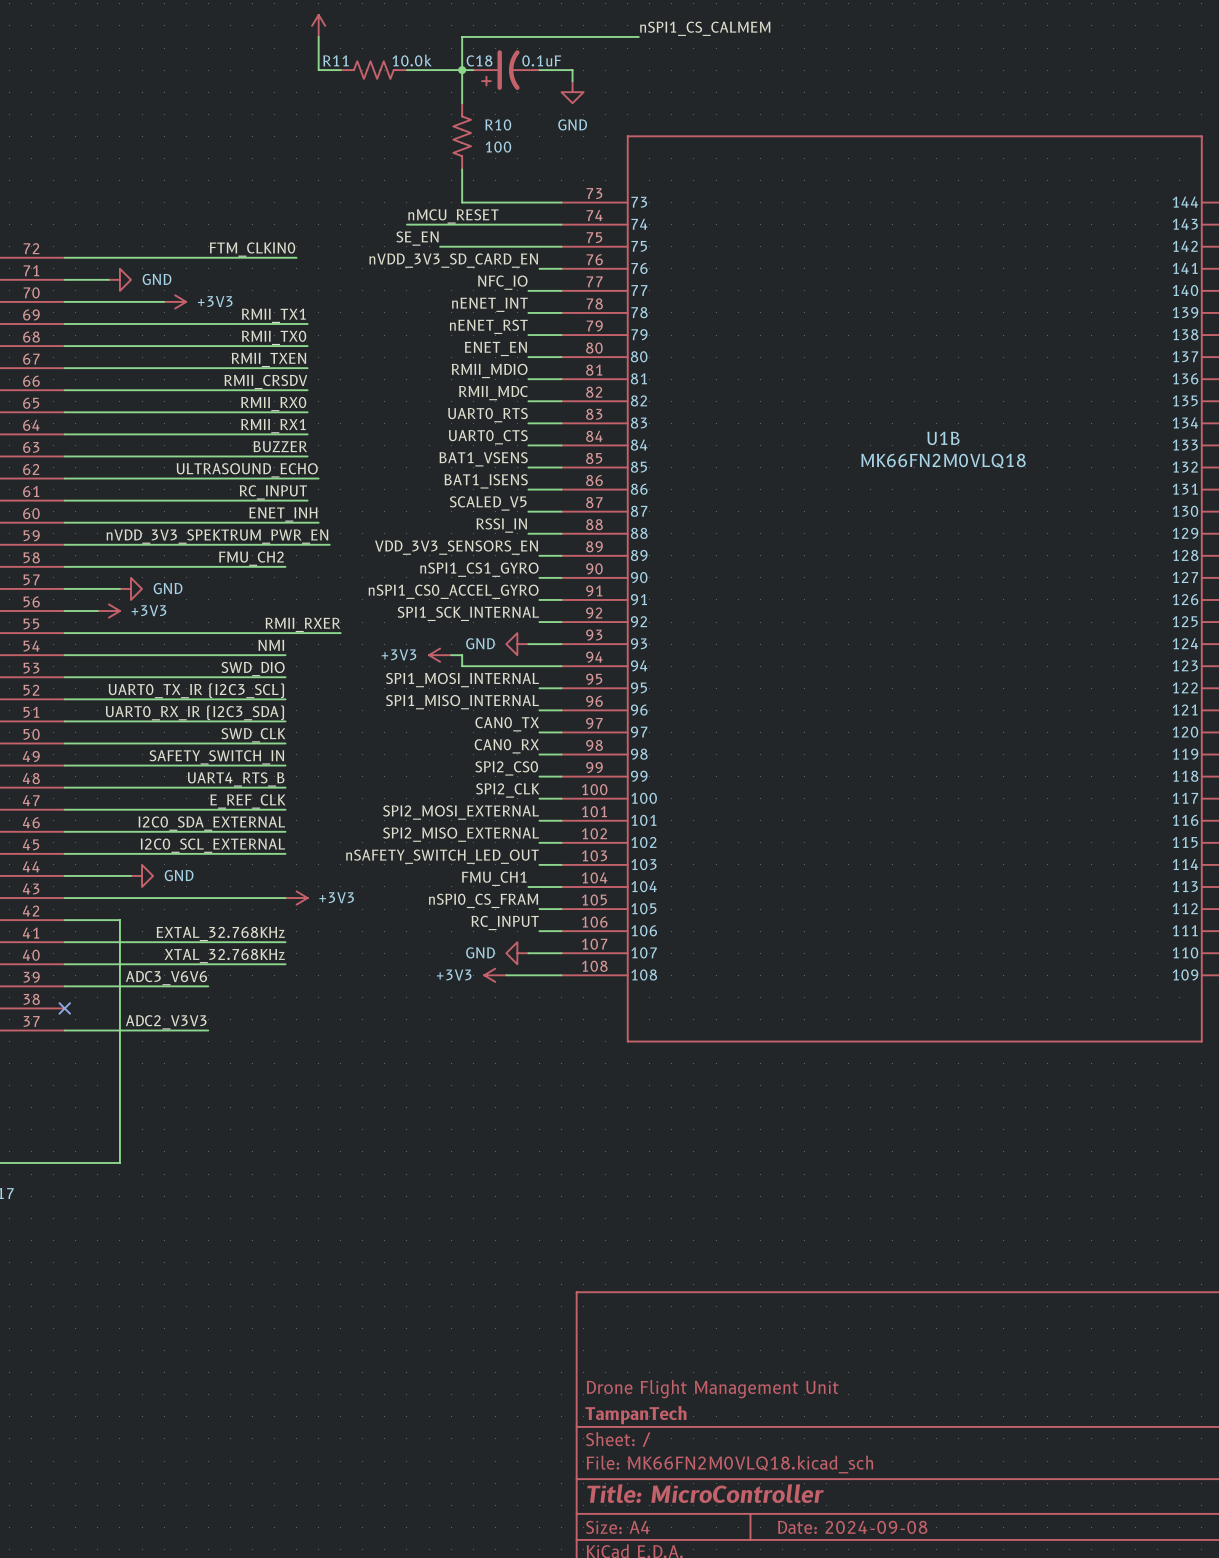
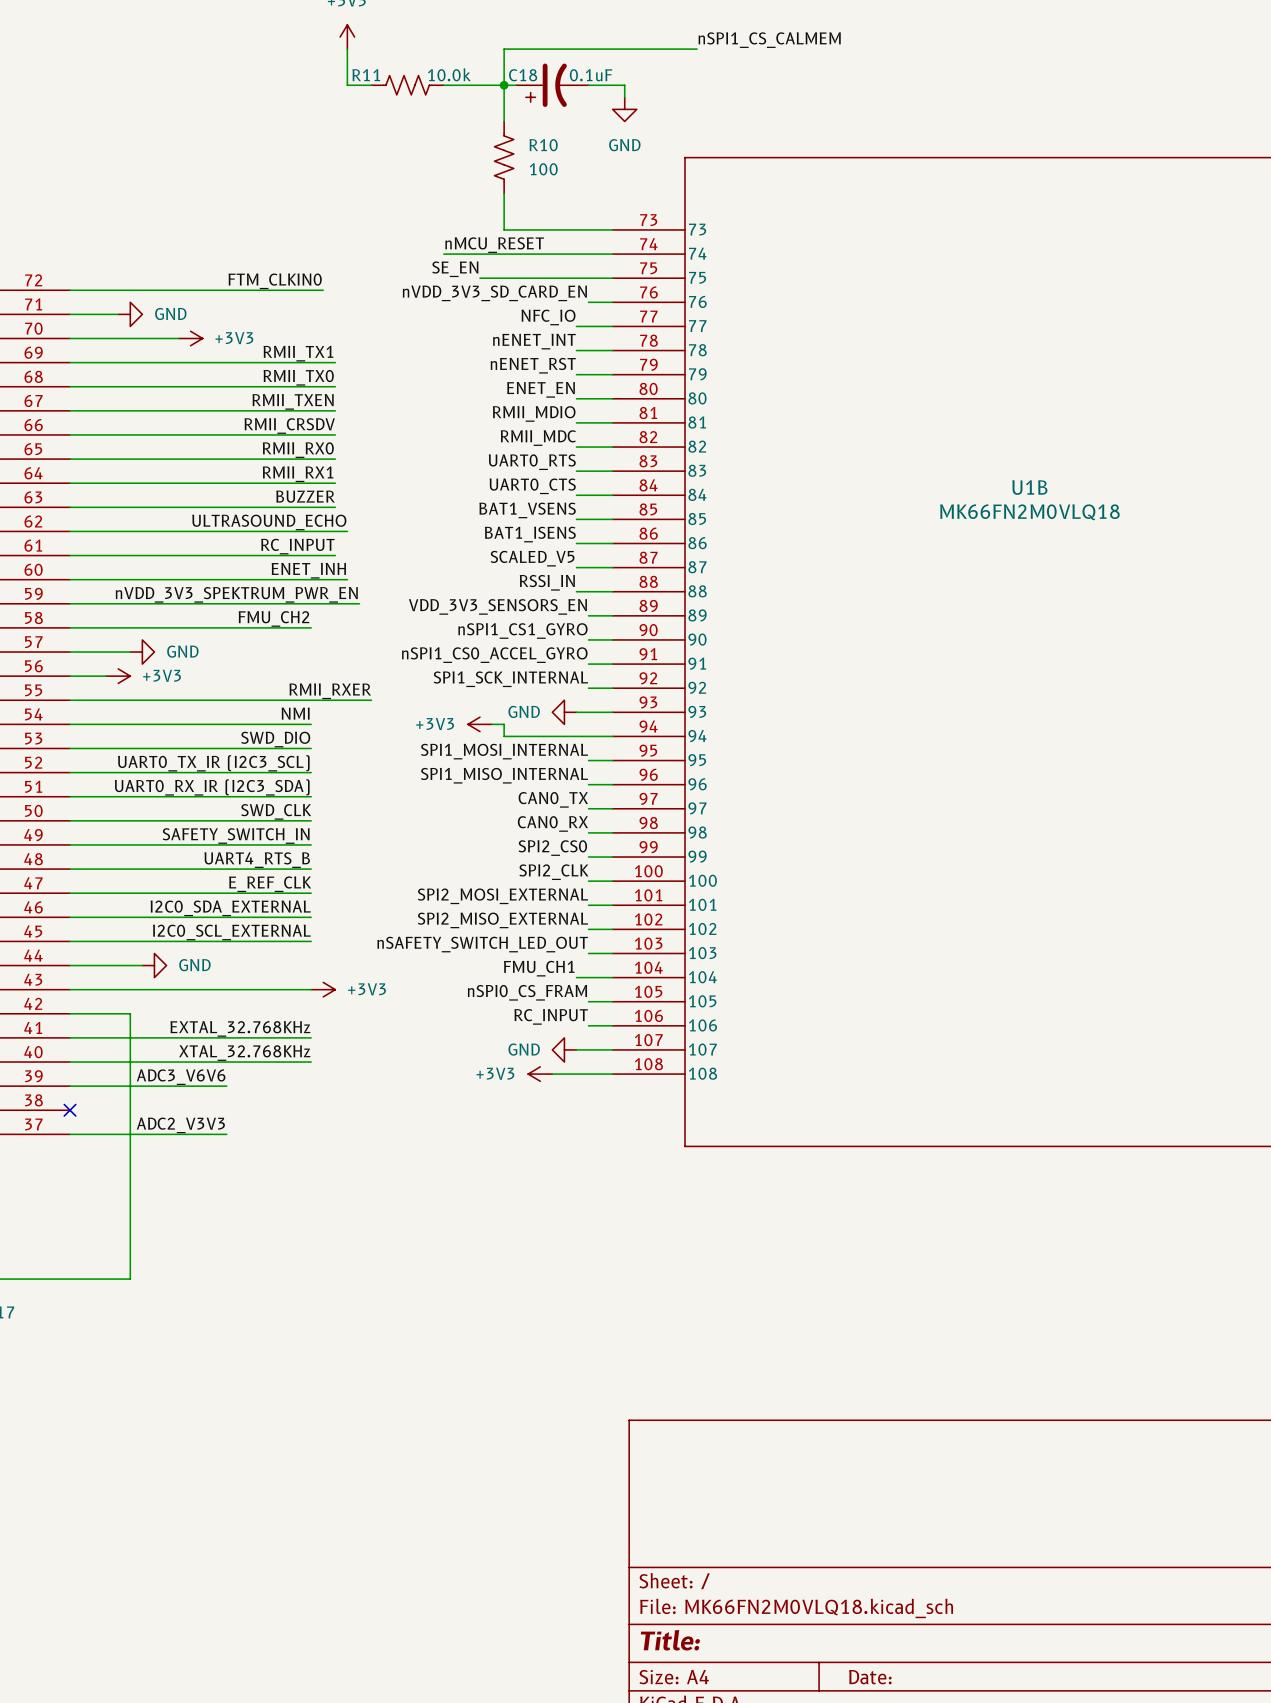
title block: Drone Flight Management Unit (712, 1389) -> none
title block: TampanTech (635, 1415) -> none
title block: Title: MicroController (705, 1493) -> Title: (670, 1640)
title block: Date: 2024-09-08 (852, 1527) -> Date: (870, 1677)

